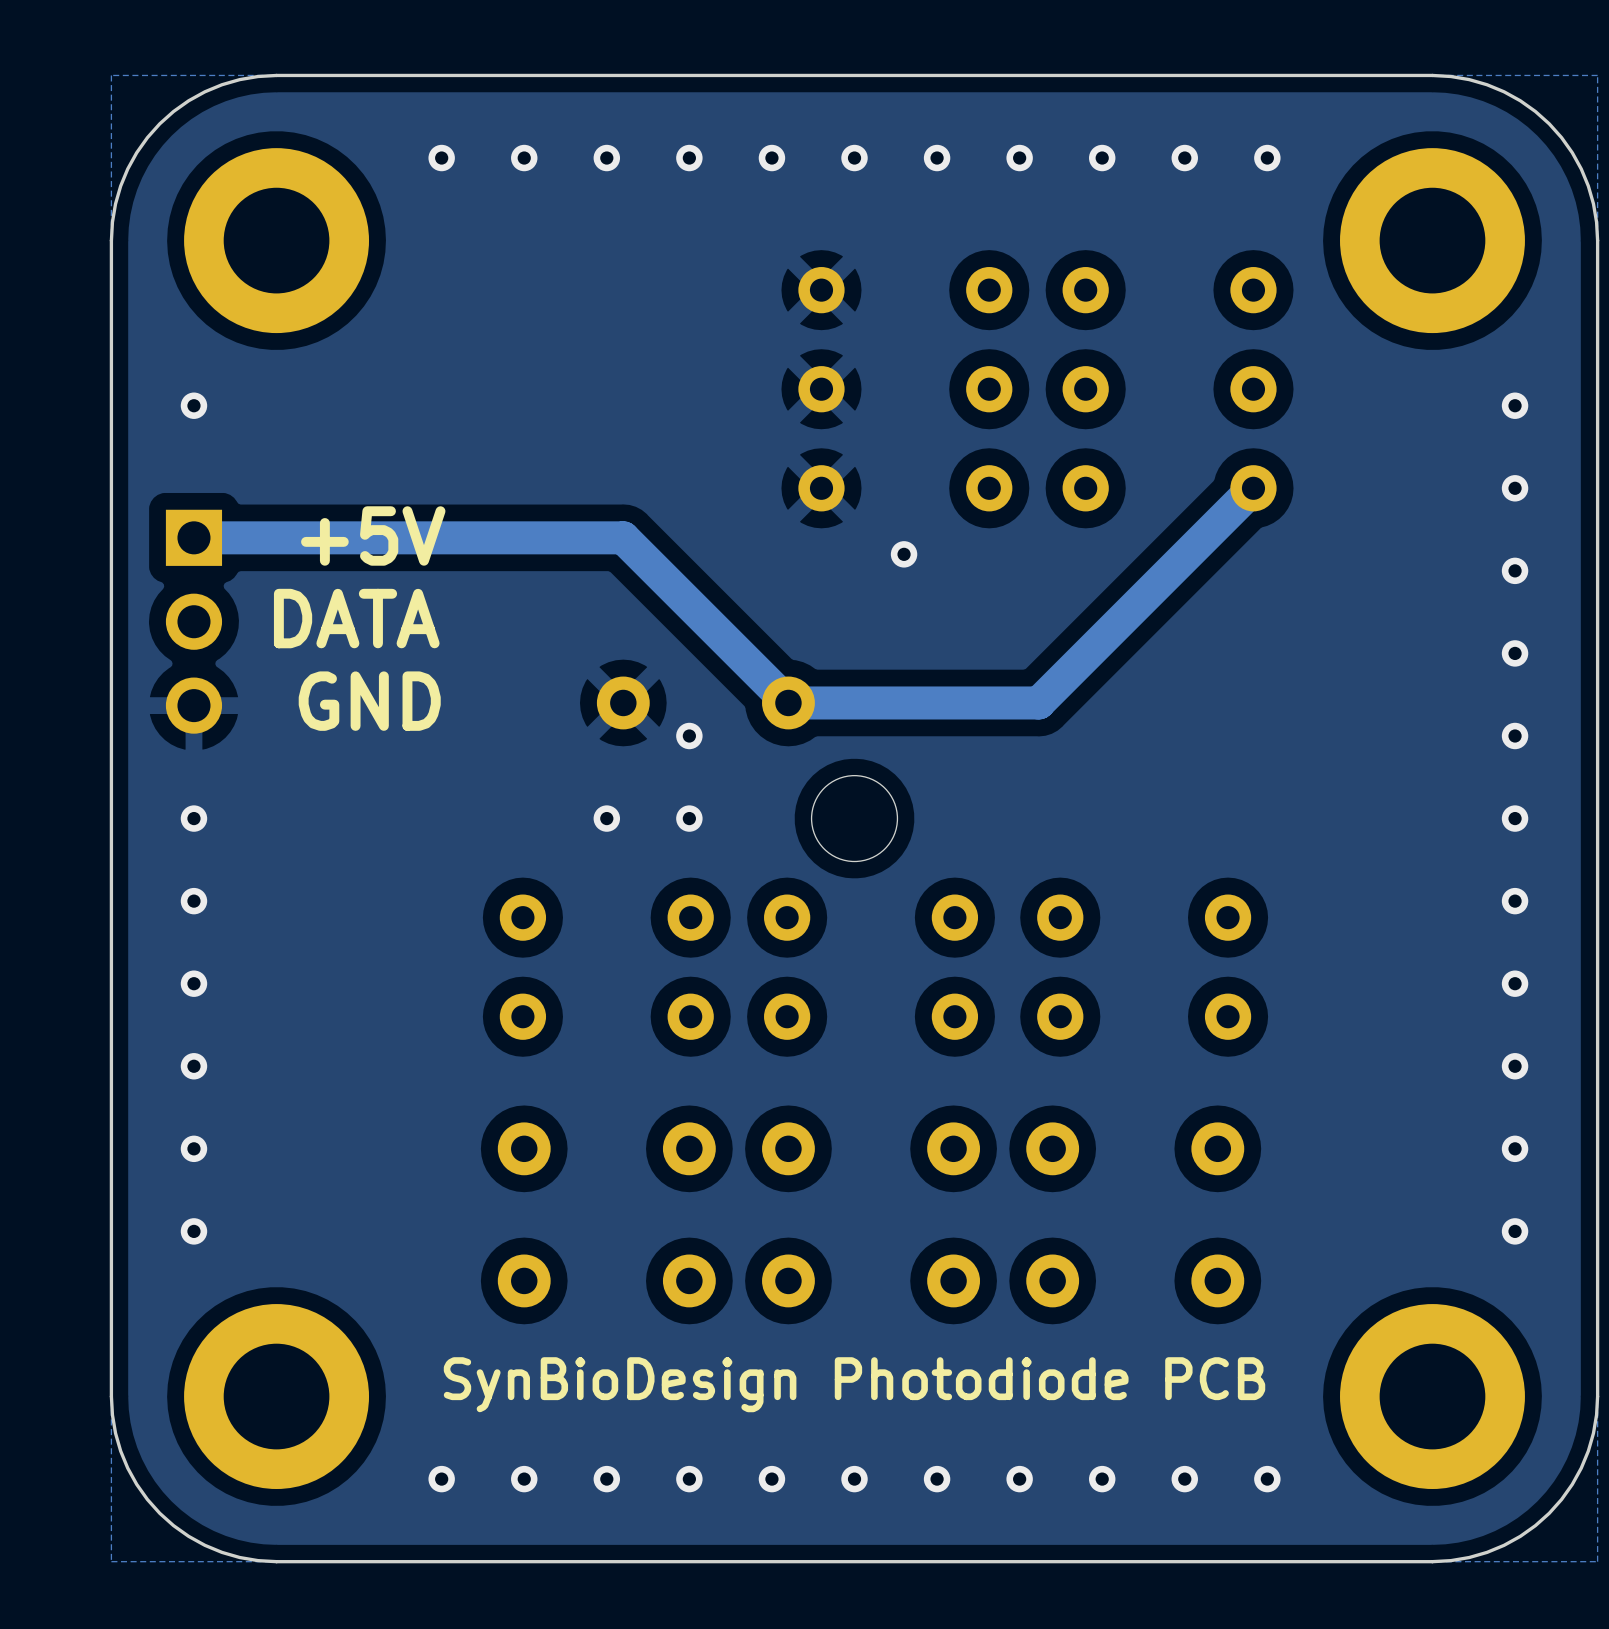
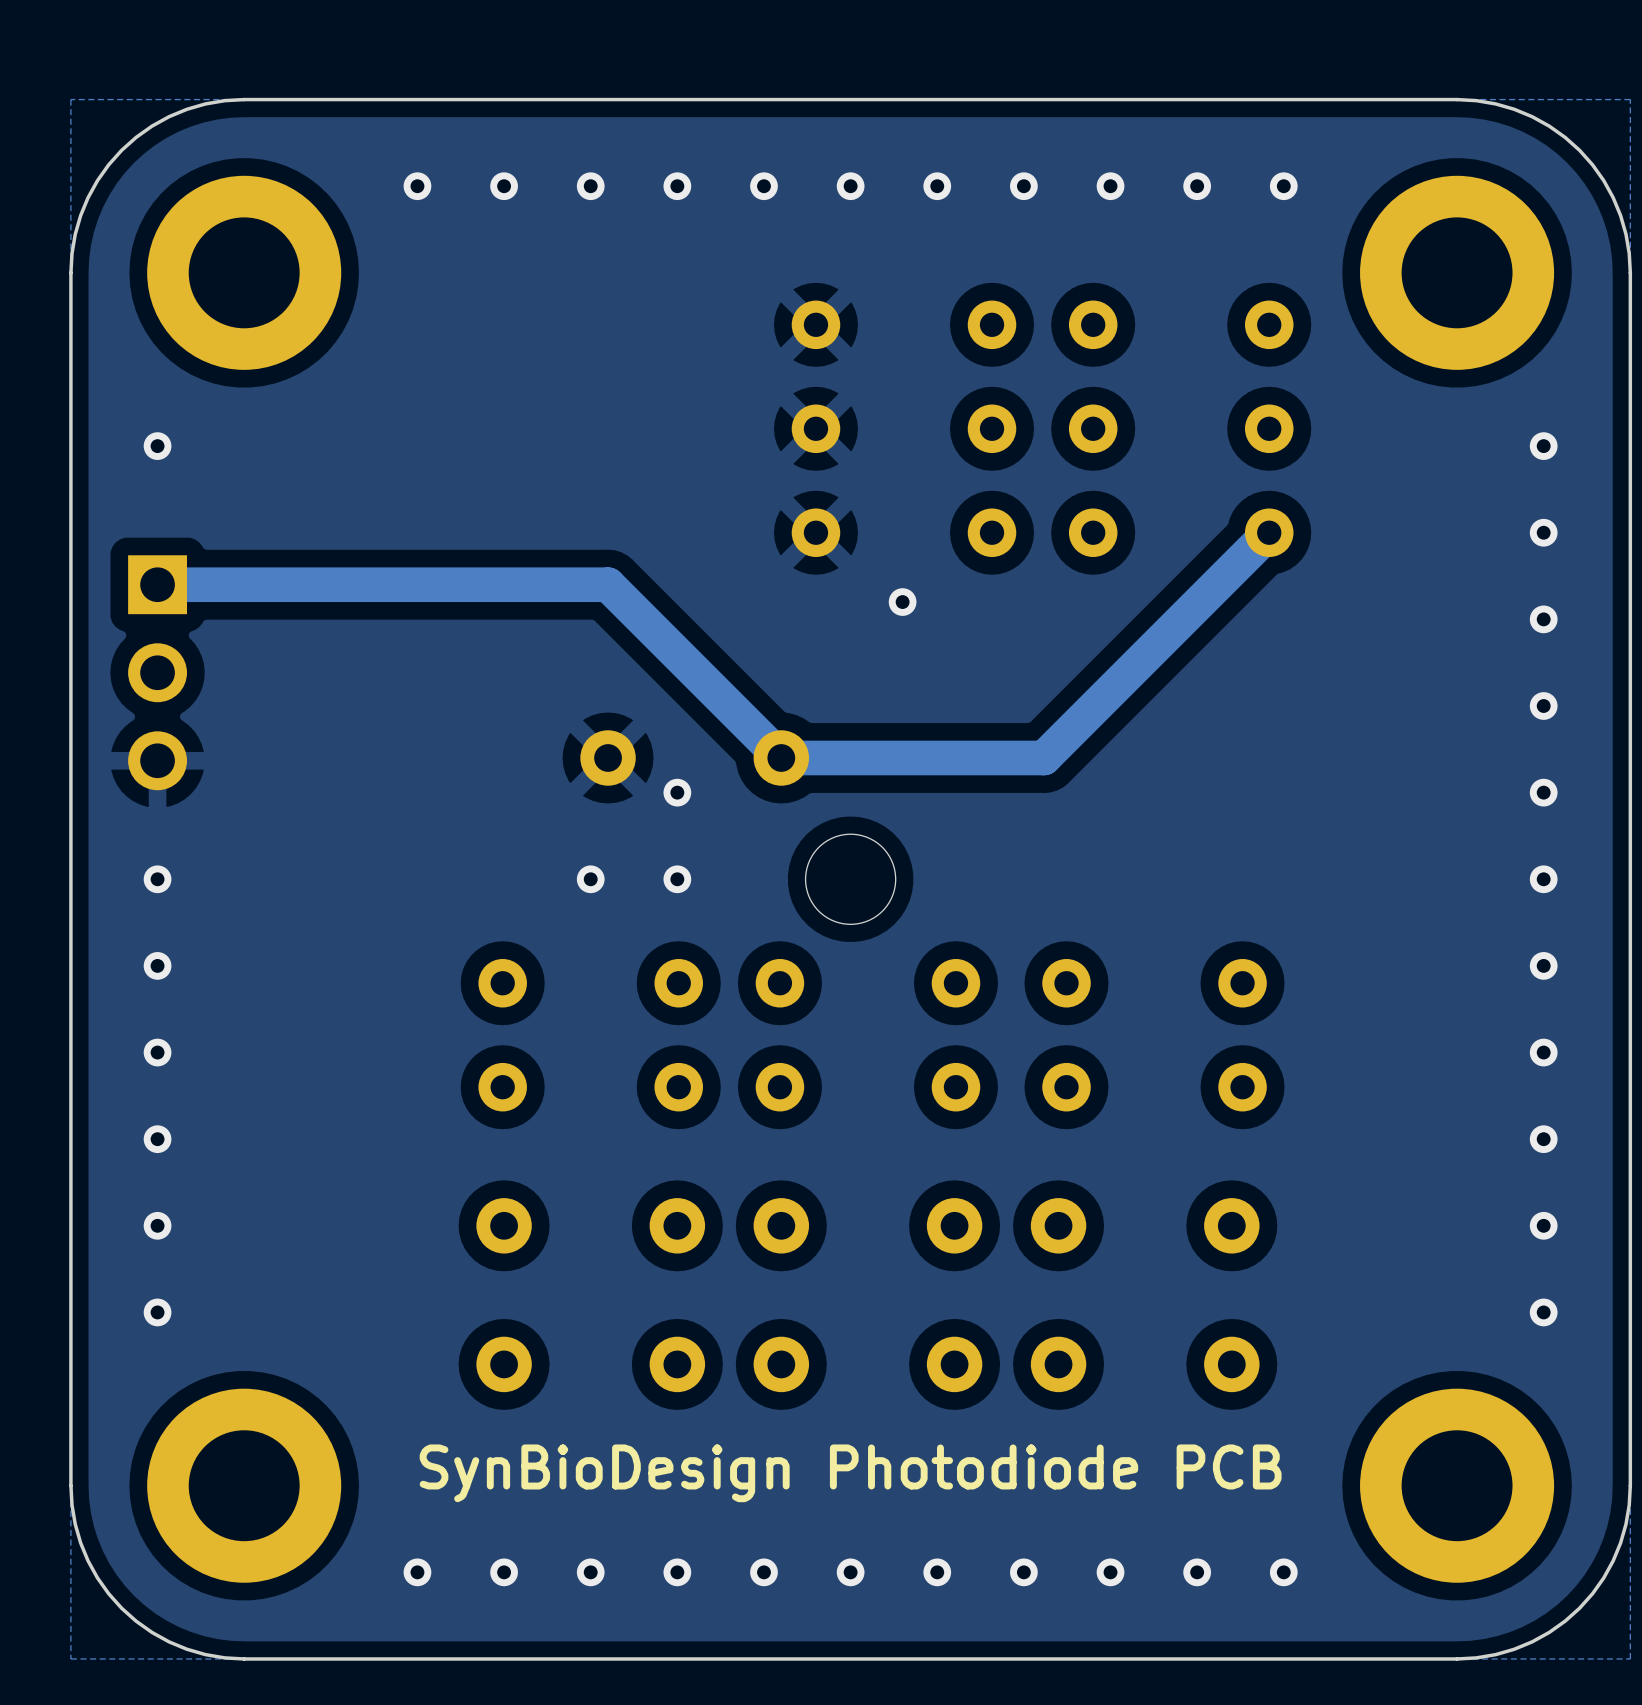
text: +5V (373, 535) -> none
text: DATA (356, 618) -> none
text: GND (369, 701) -> none

